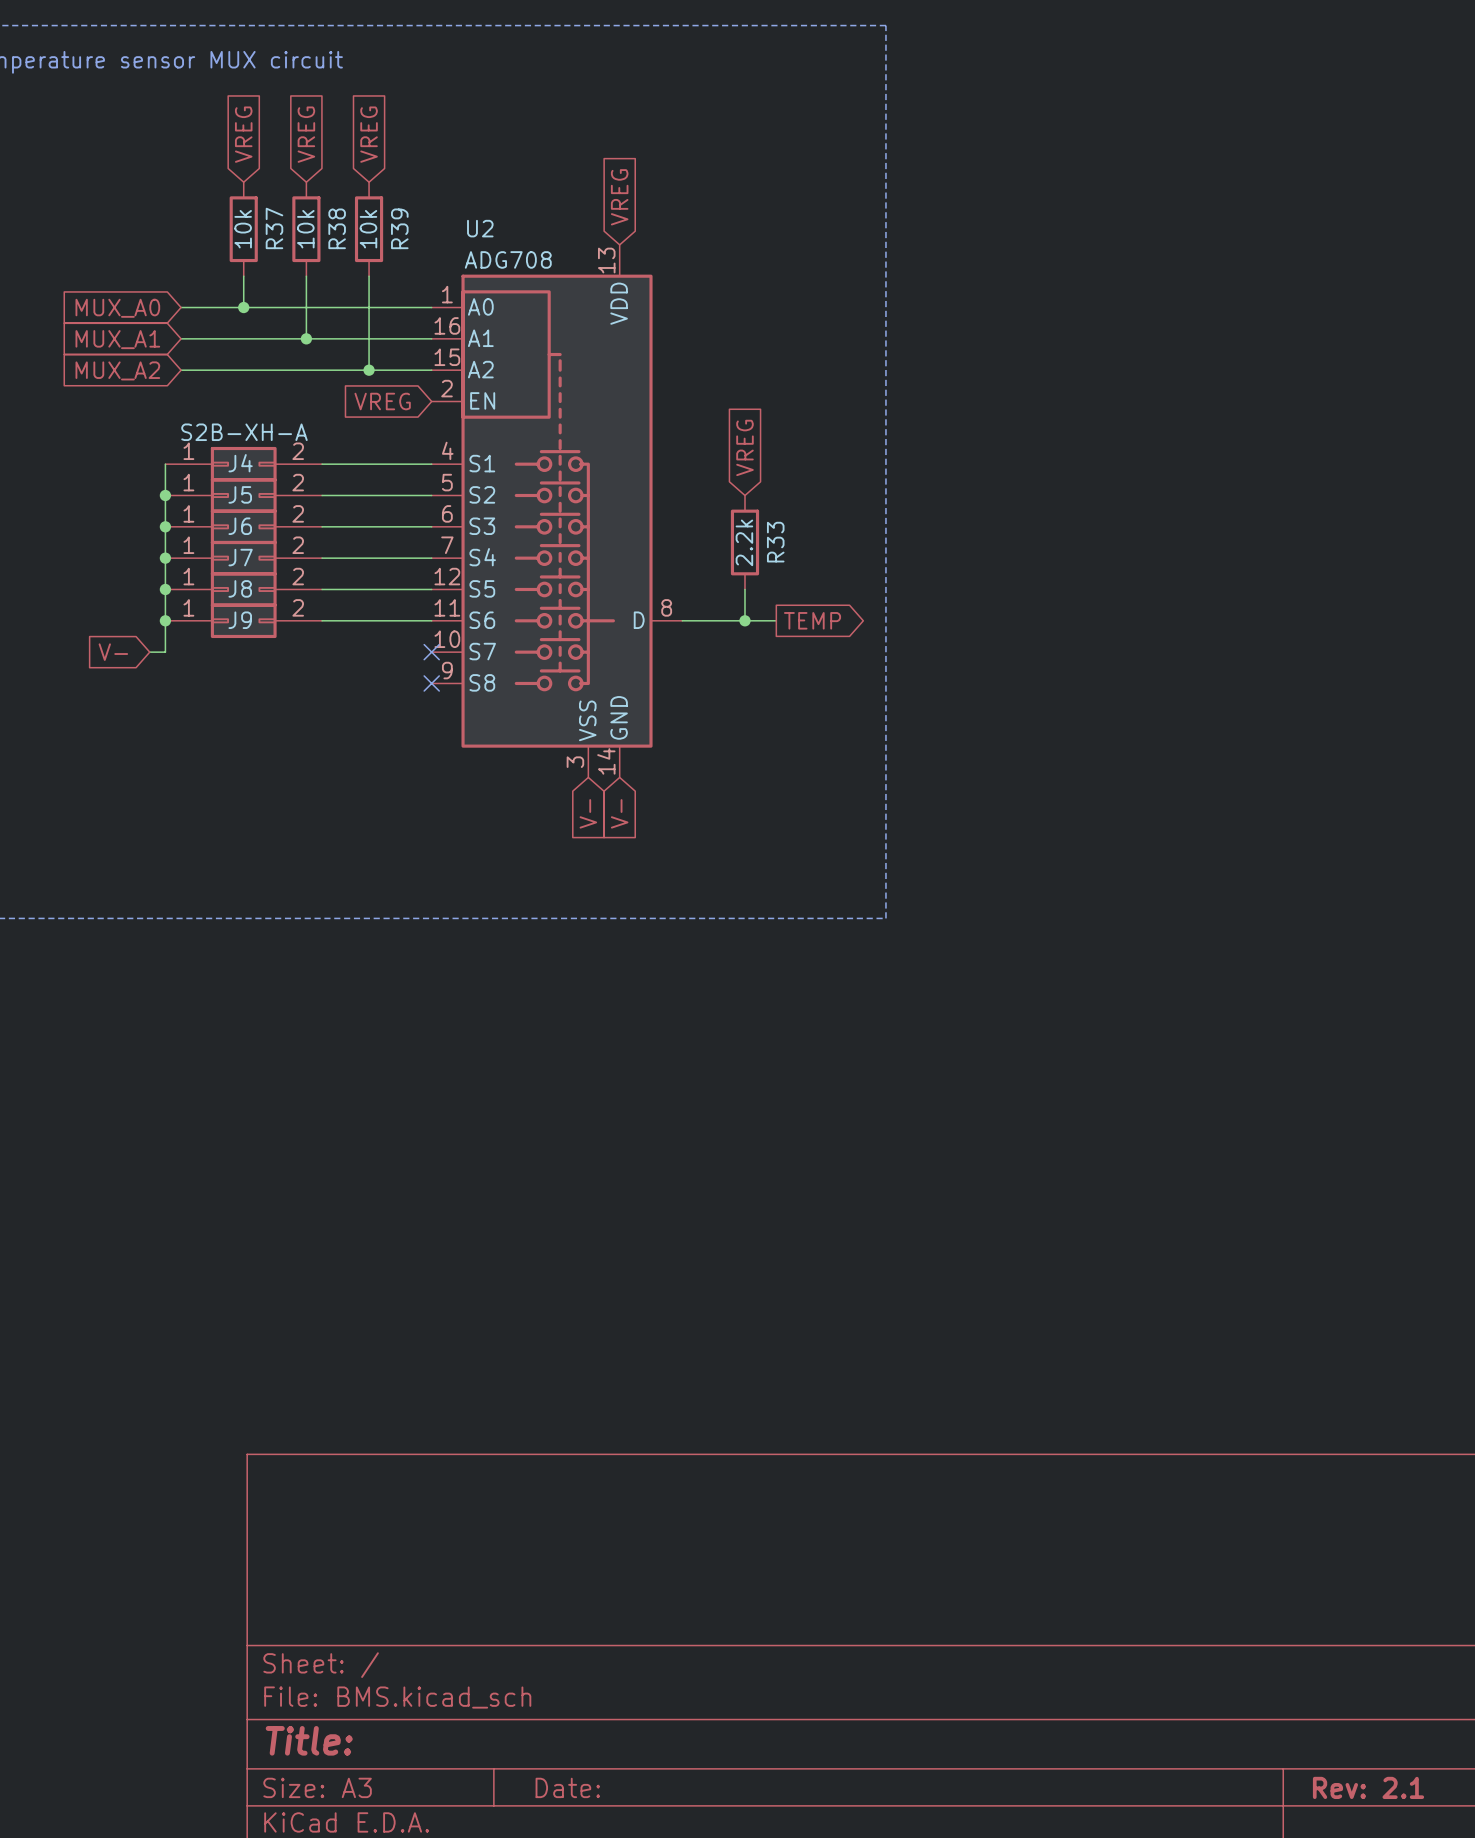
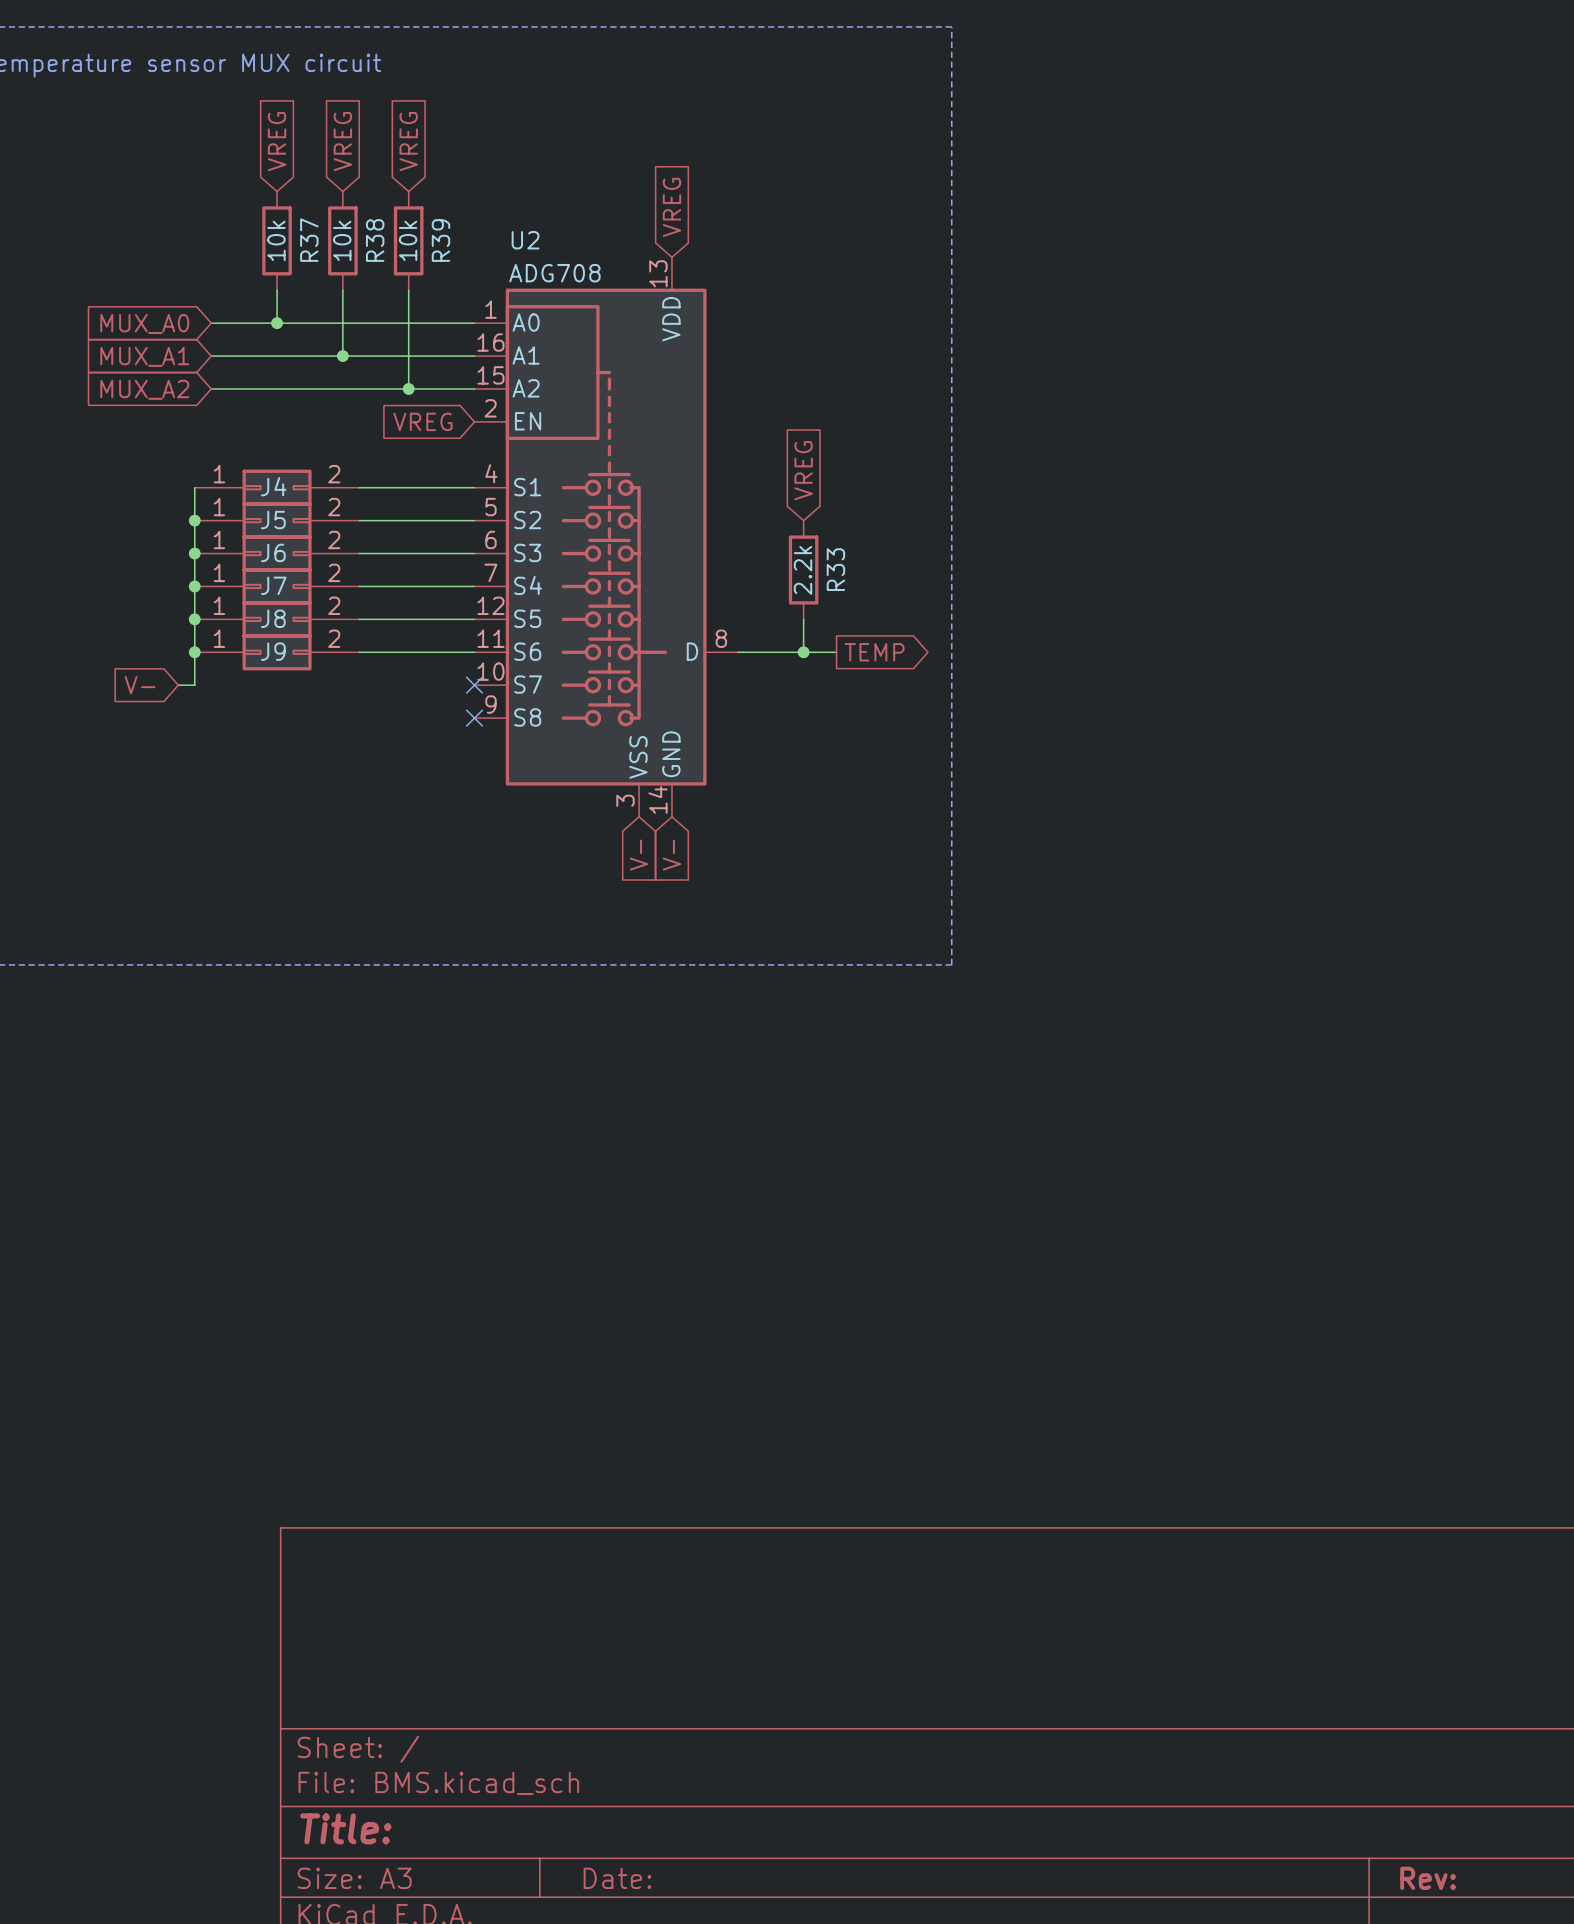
J4 value: S2B-XH-A (244, 432) -> none
title block: Rev: 2.1 (1368, 1787) -> Rev: (1428, 1878)

